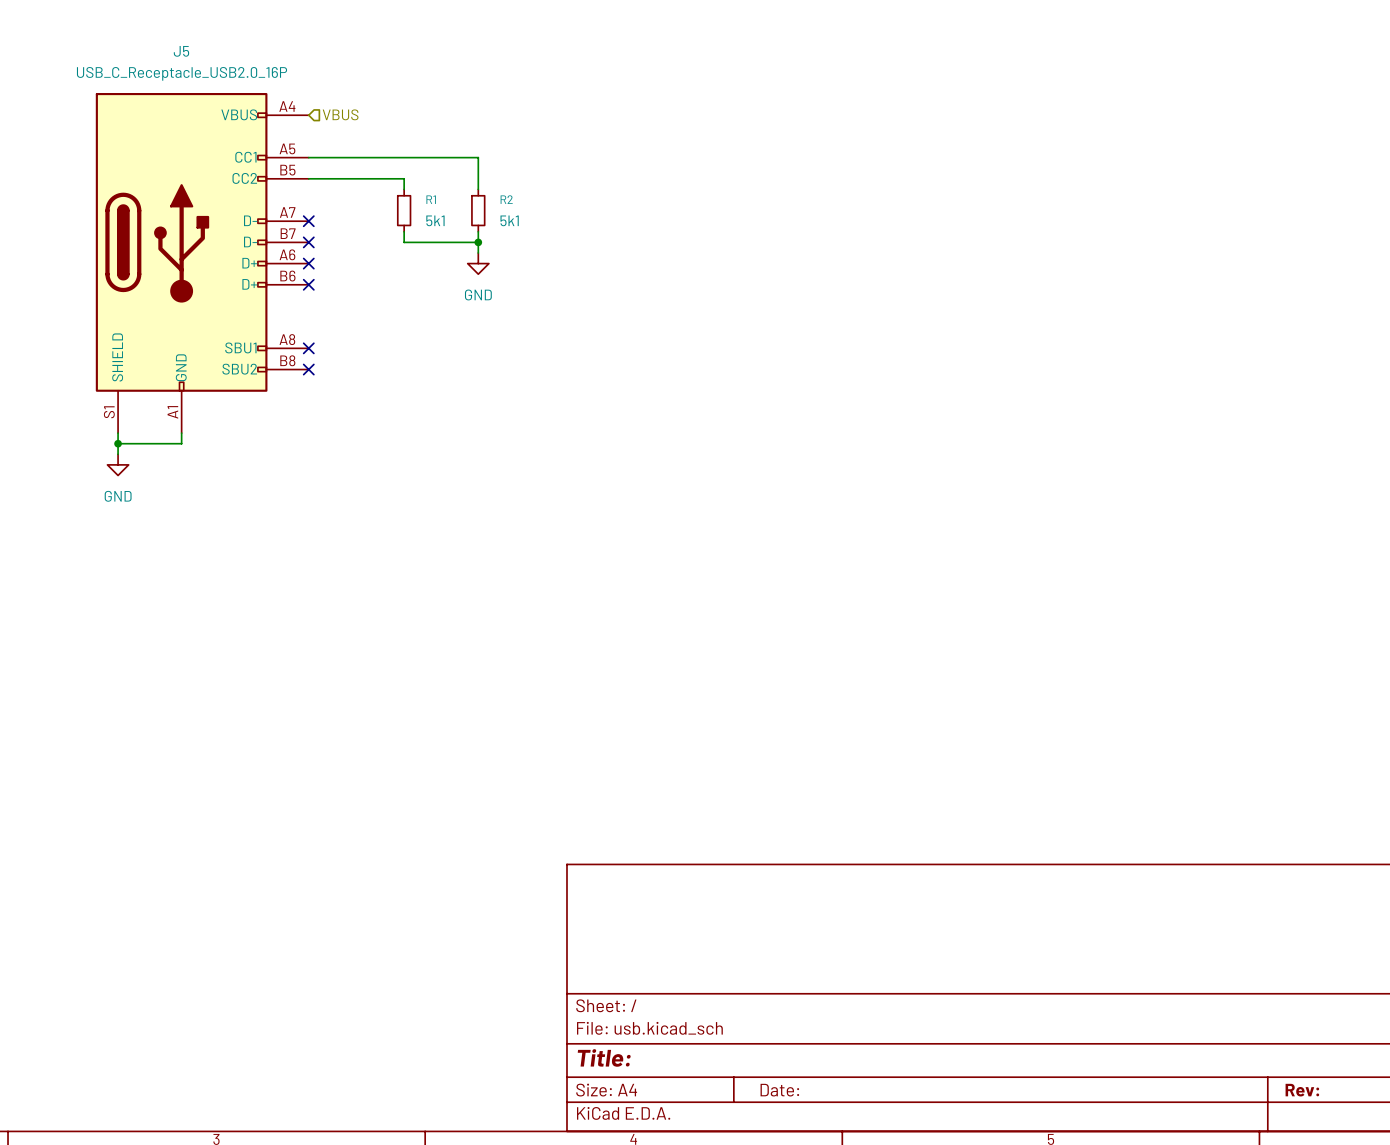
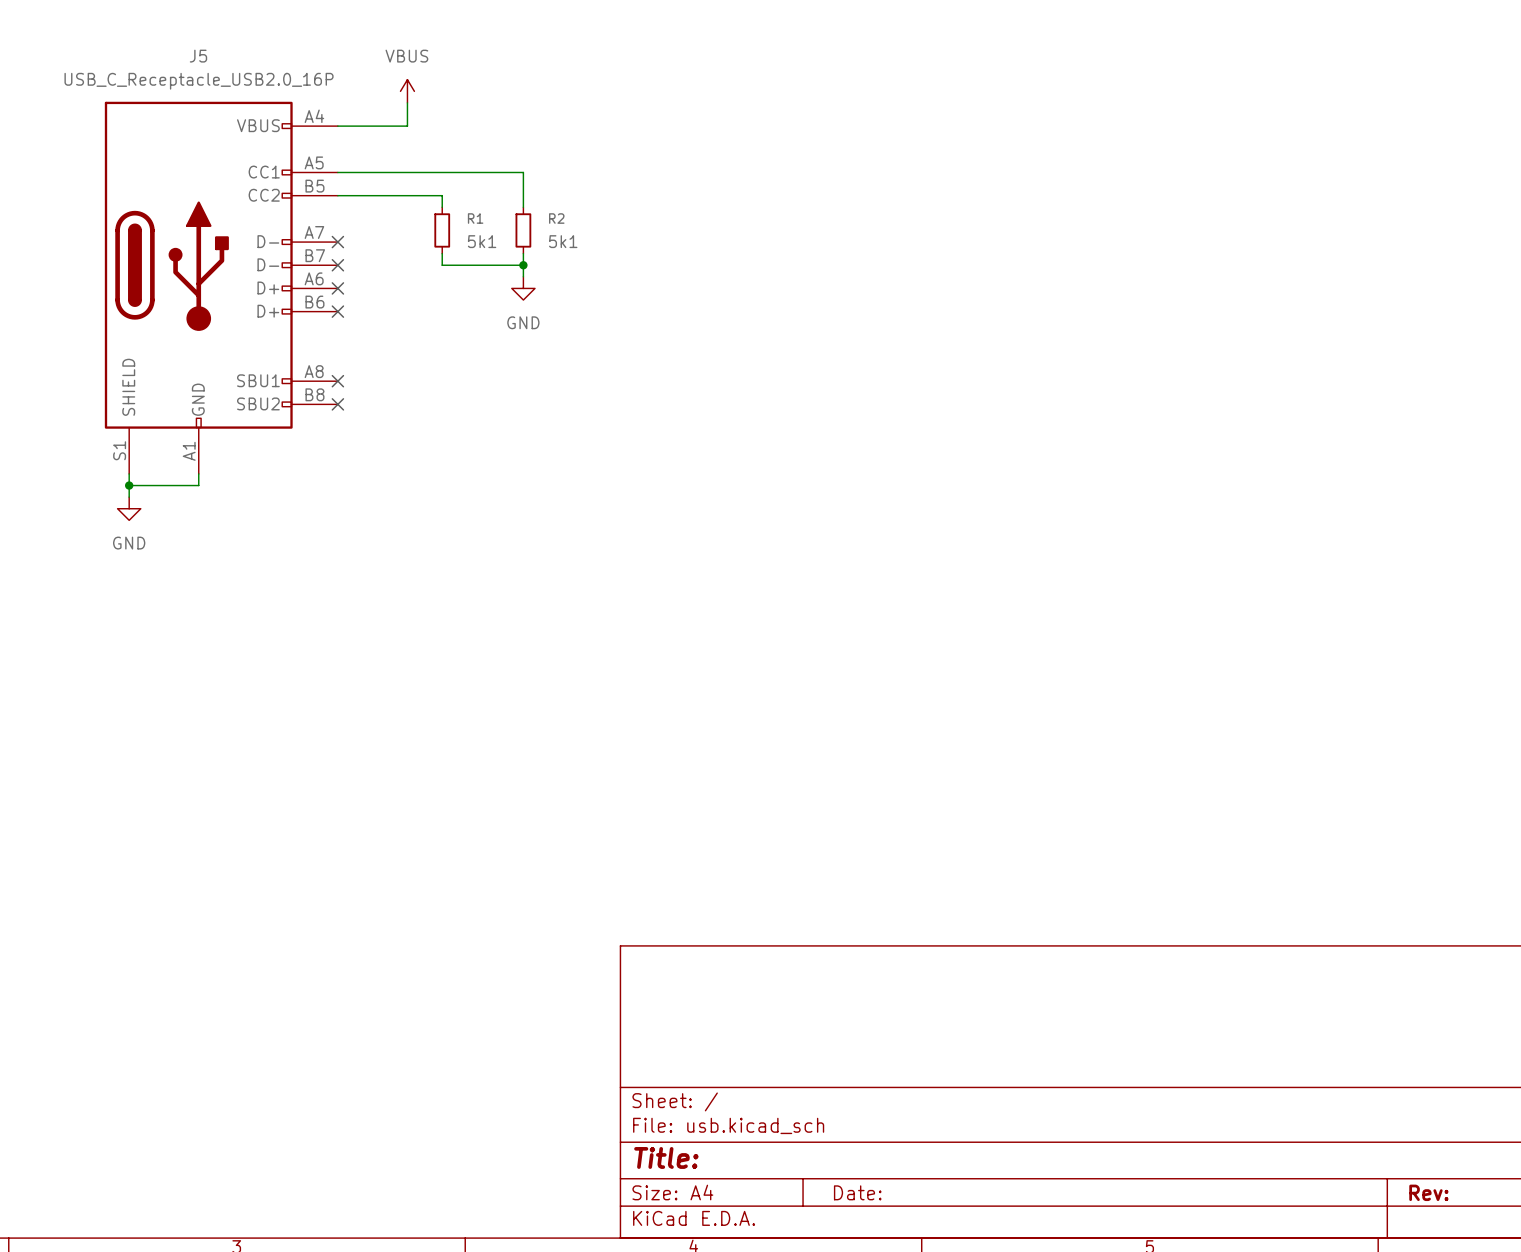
power symbol: none -> VBUS (407, 91)
wire: none -> (407, 102) (407, 126) (337, 126)
hierarchical label: VBUS (340, 114) -> none

